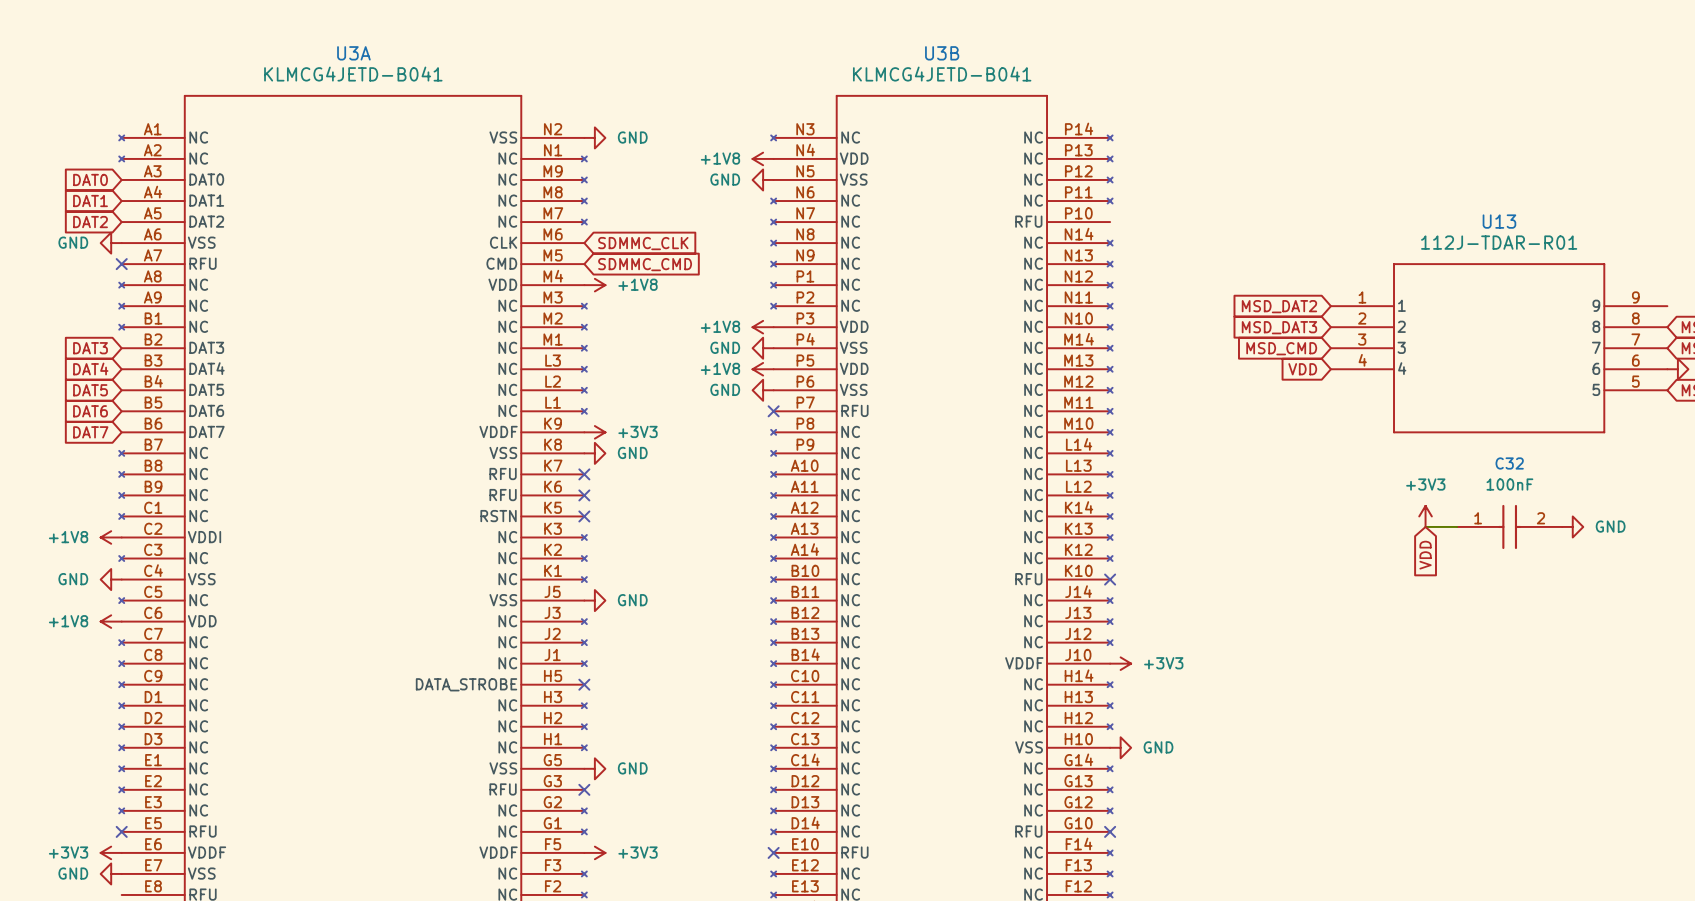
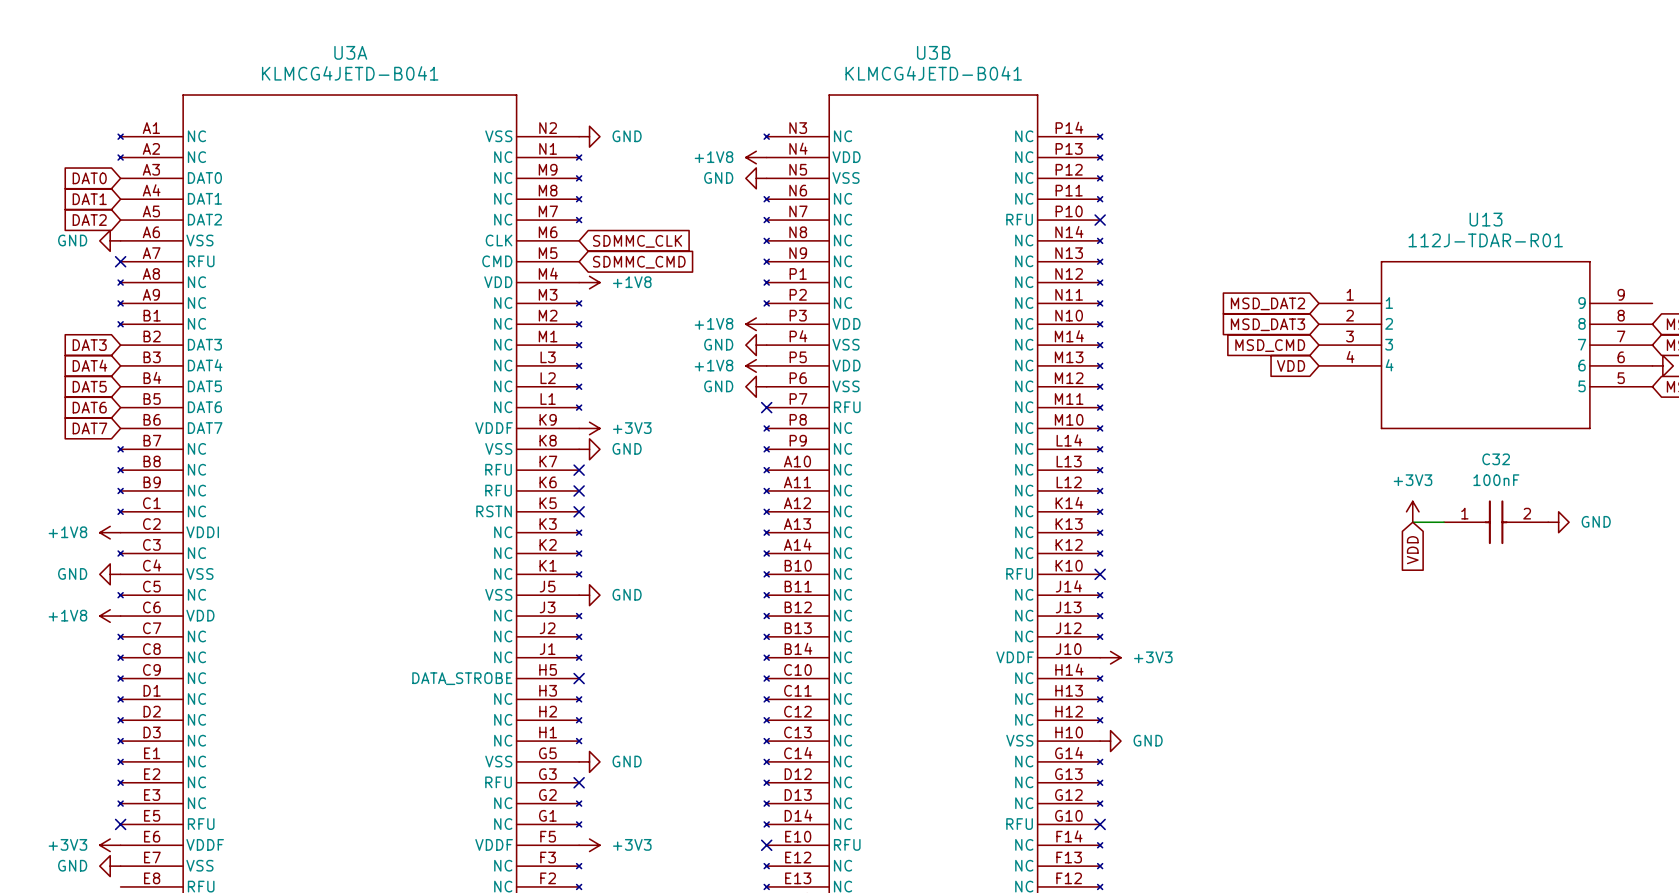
no-connect mark: none -> (1100, 220)

